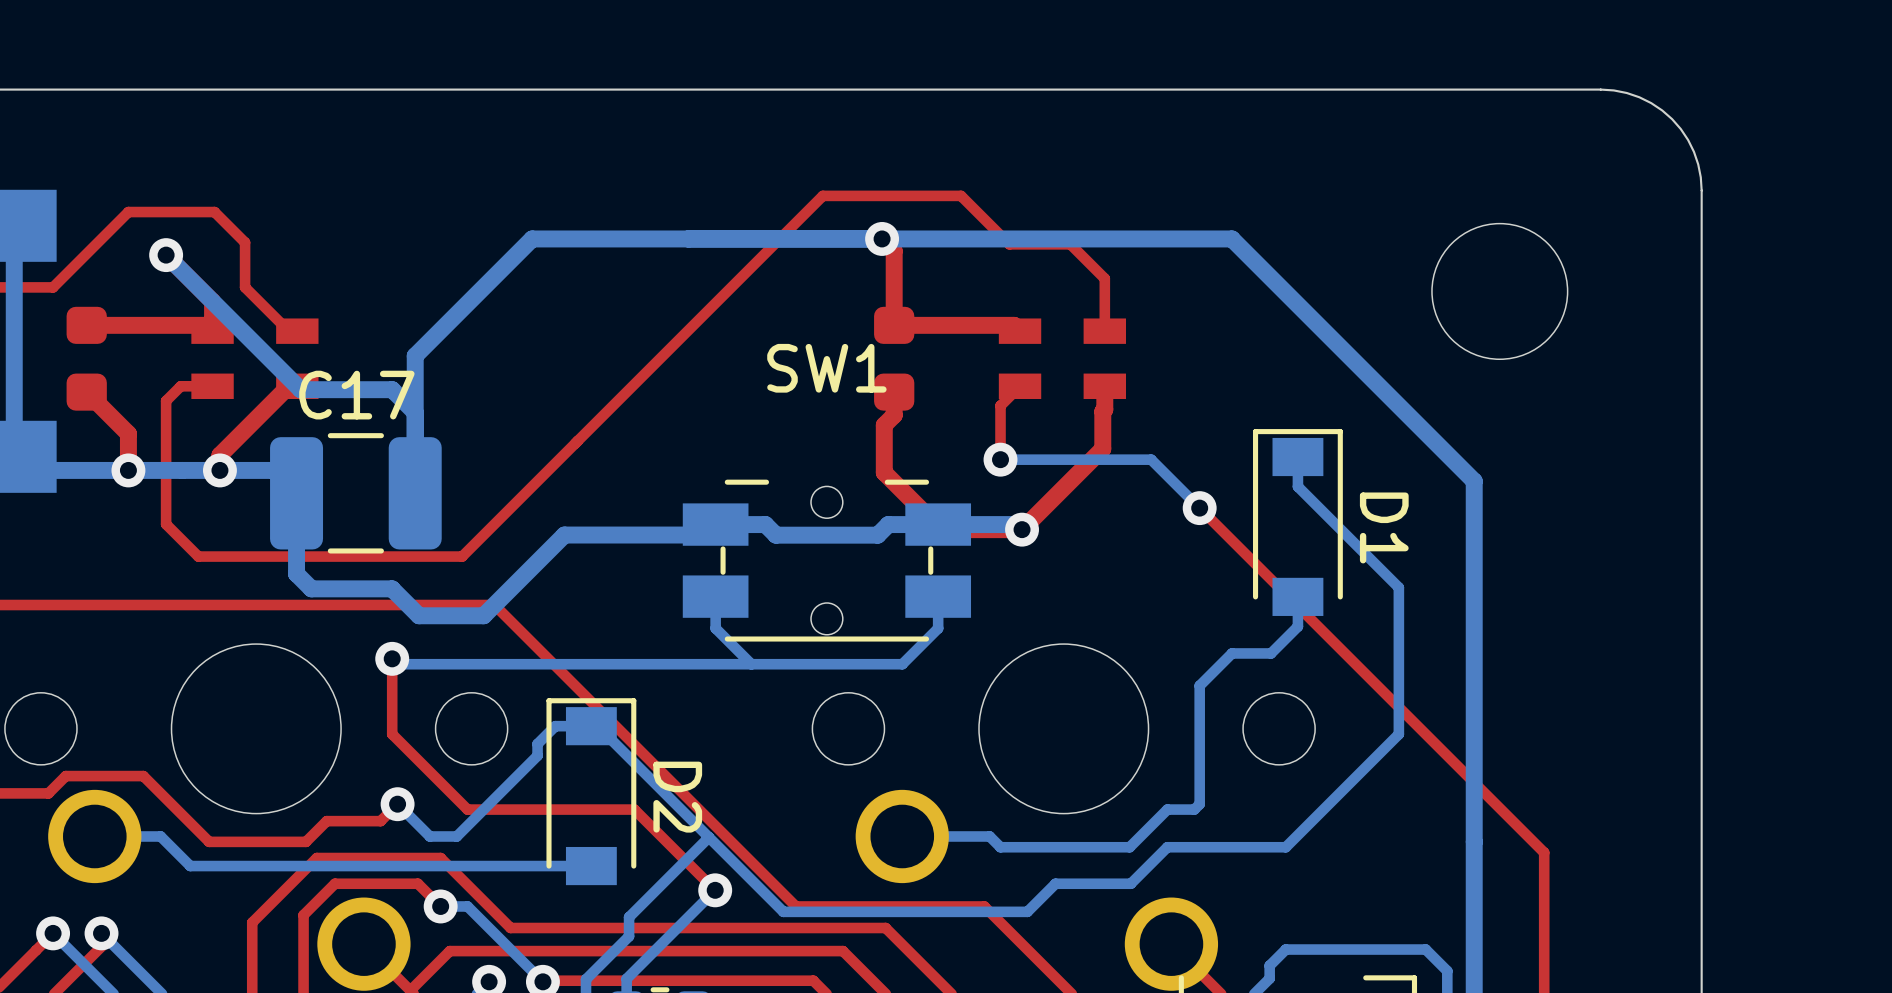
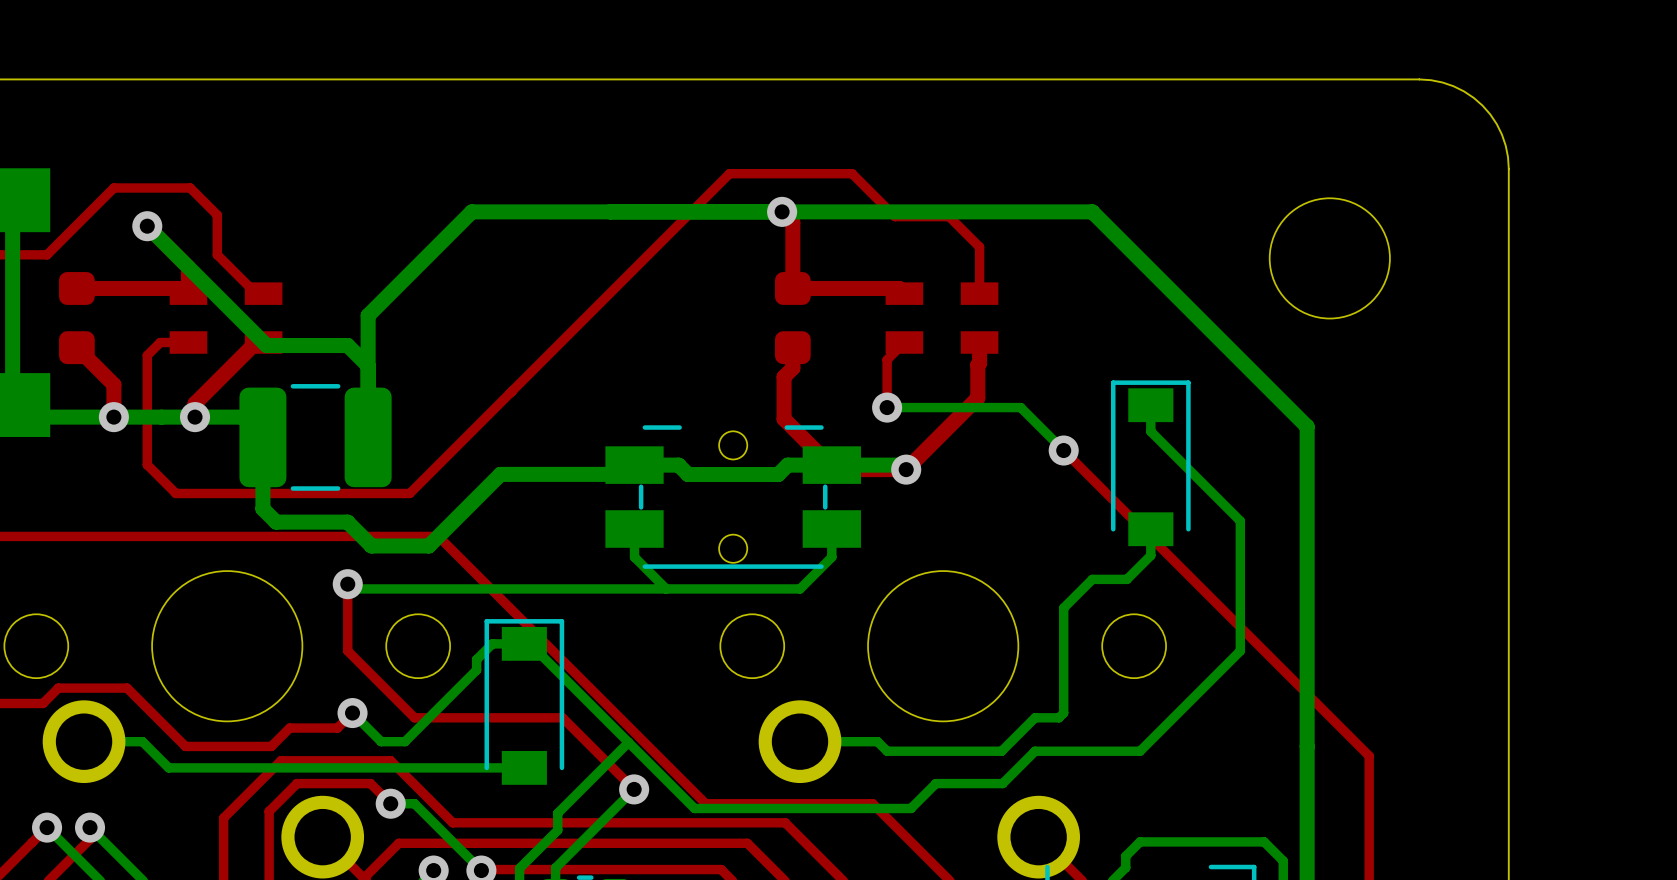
SW1 name: SW1 (826, 368) -> none
C17 name: C17 (356, 395) -> none
D1 name: D1 (1384, 527) -> none
D2 name: D2 (677, 797) -> none

